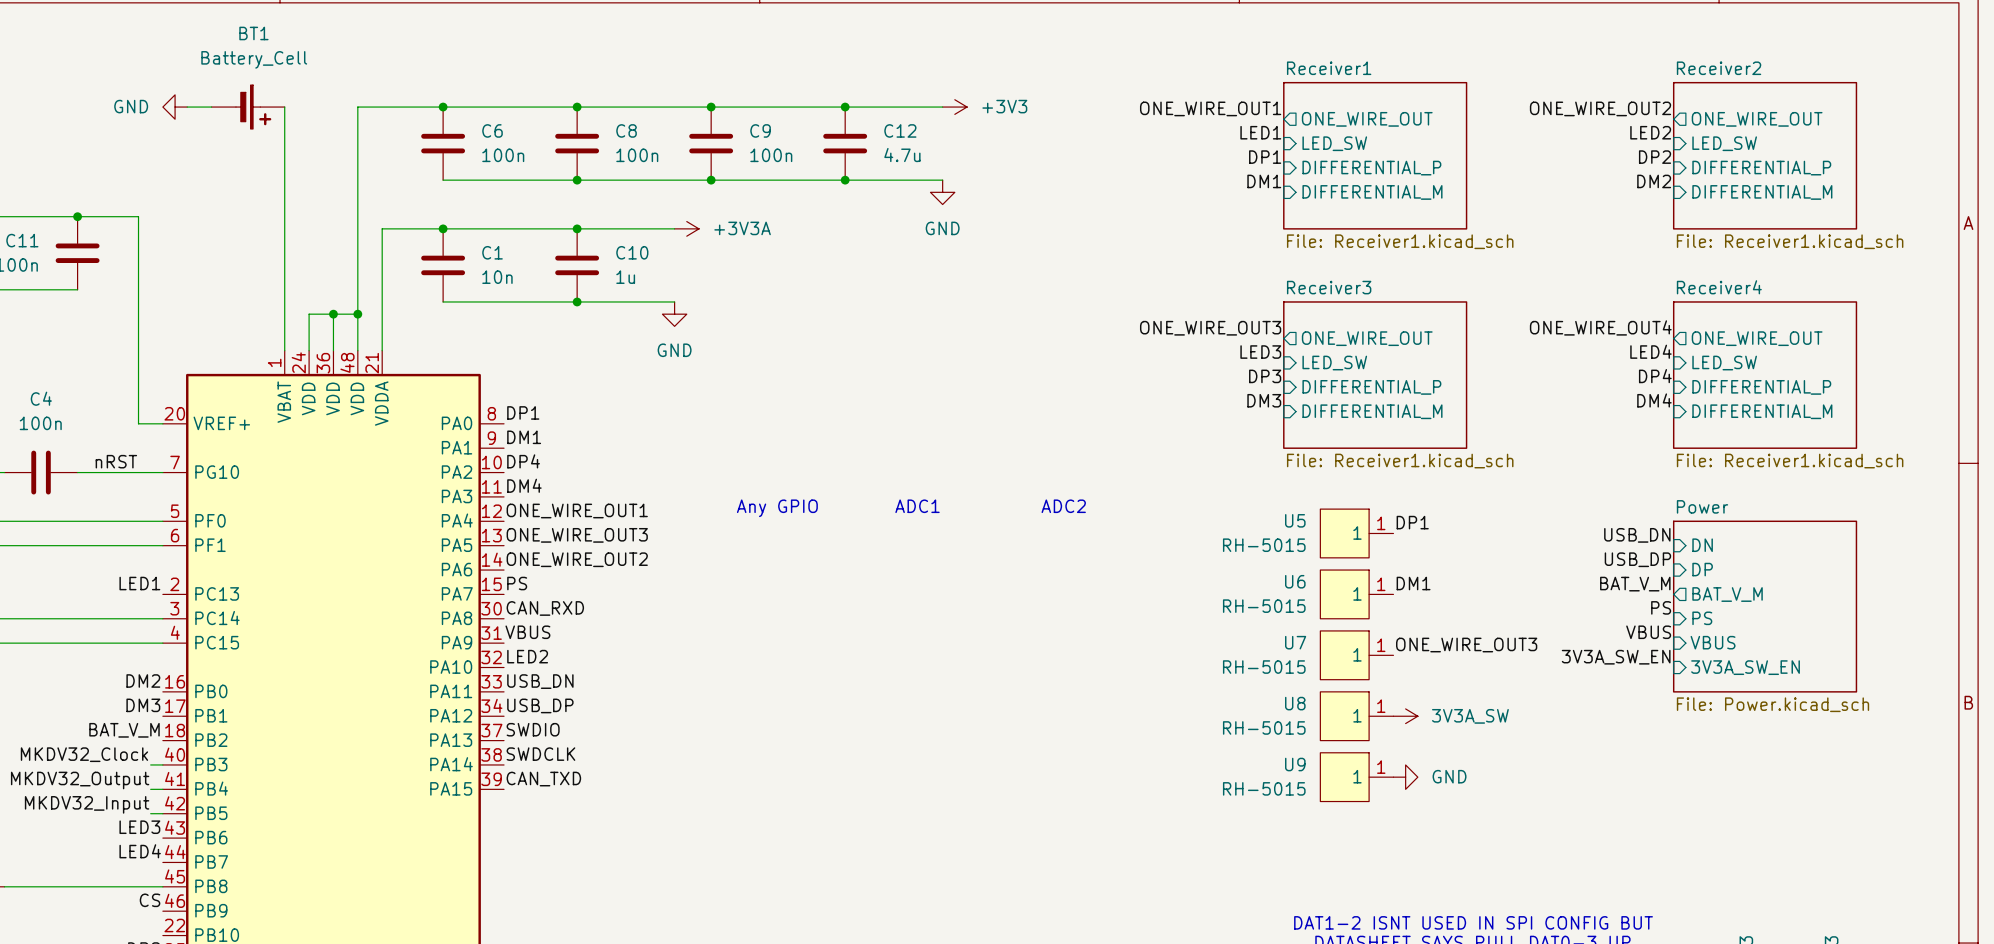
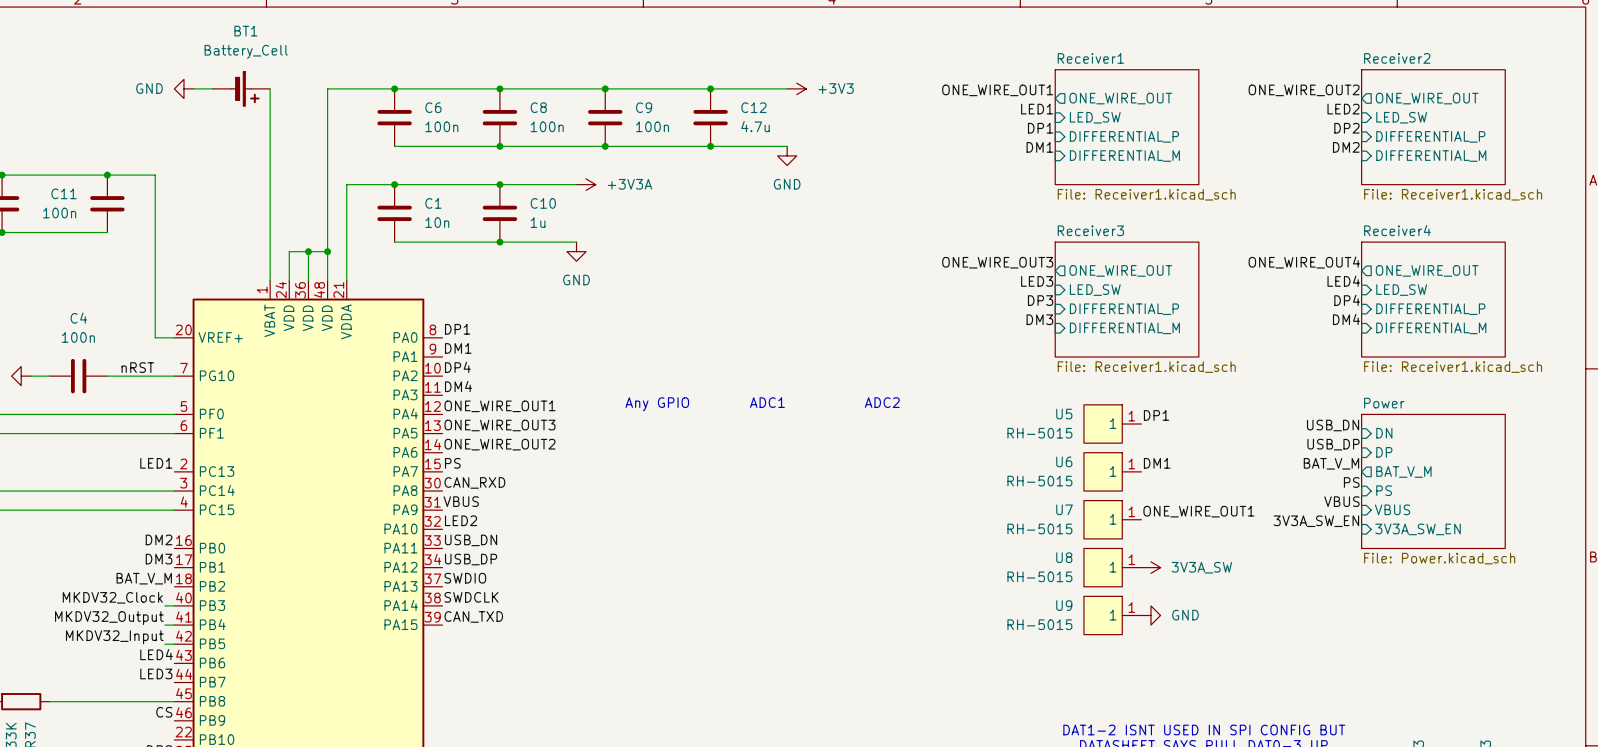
label: ONE_WIRE_OUT3 (1466, 645) -> ONE_WIRE_OUT1 (1198, 511)
label: LED3 (139, 827) -> LED4 (156, 654)
label: LED4 (140, 851) -> LED3 (156, 673)

